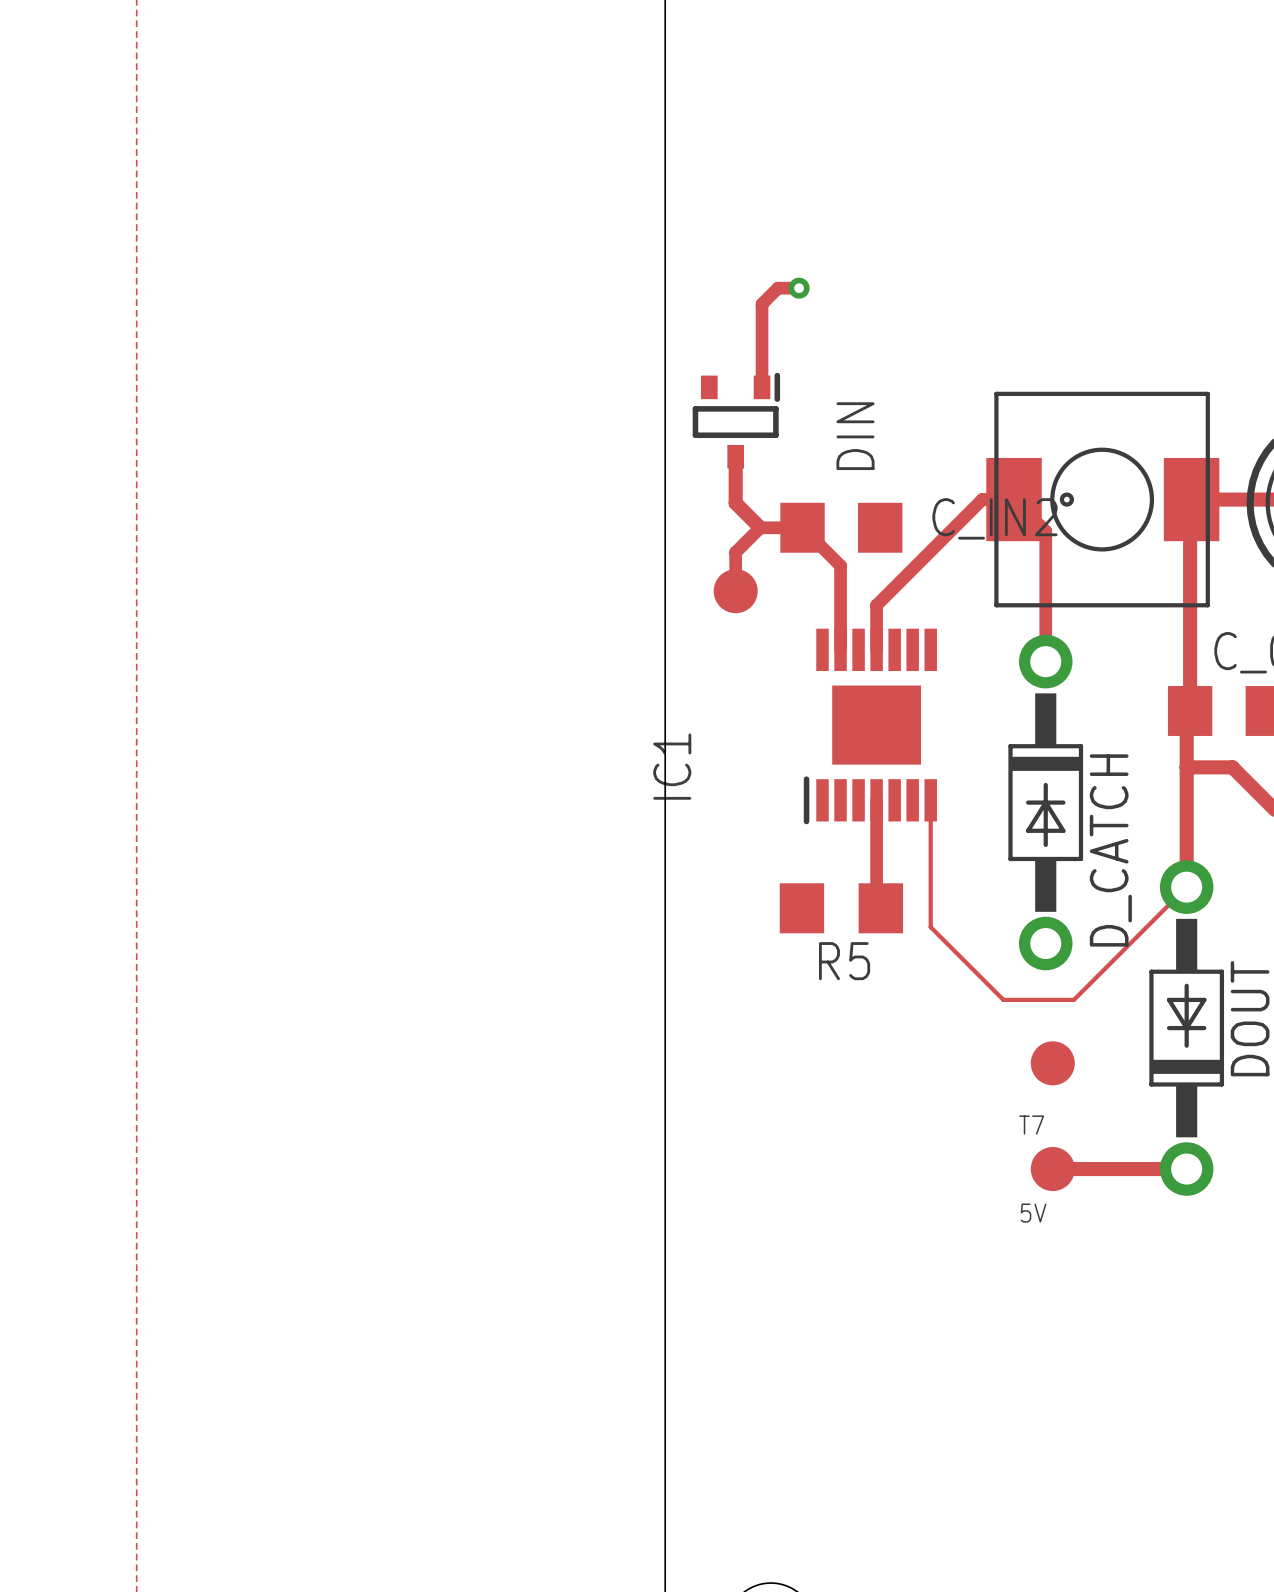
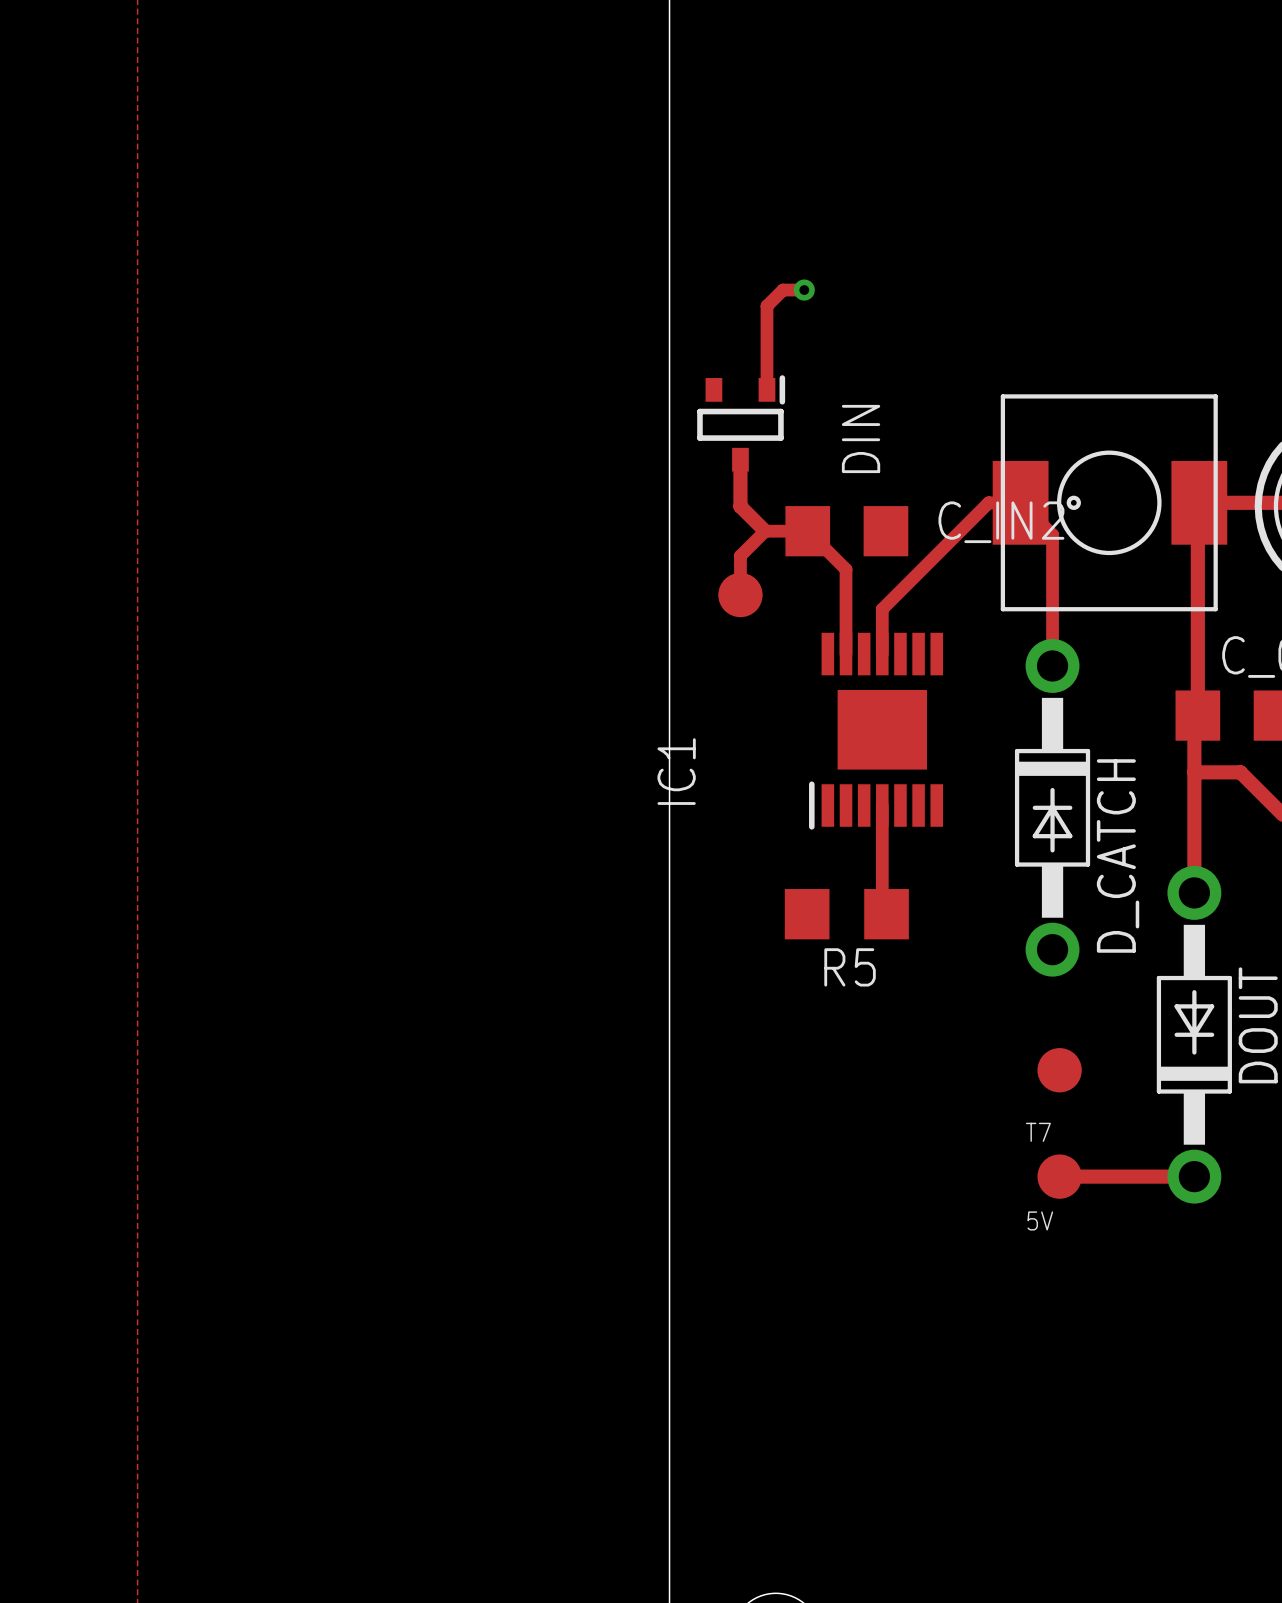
track: (930, 800) (930, 927) (1003, 999) (1073, 999) (1186, 887) -> none

